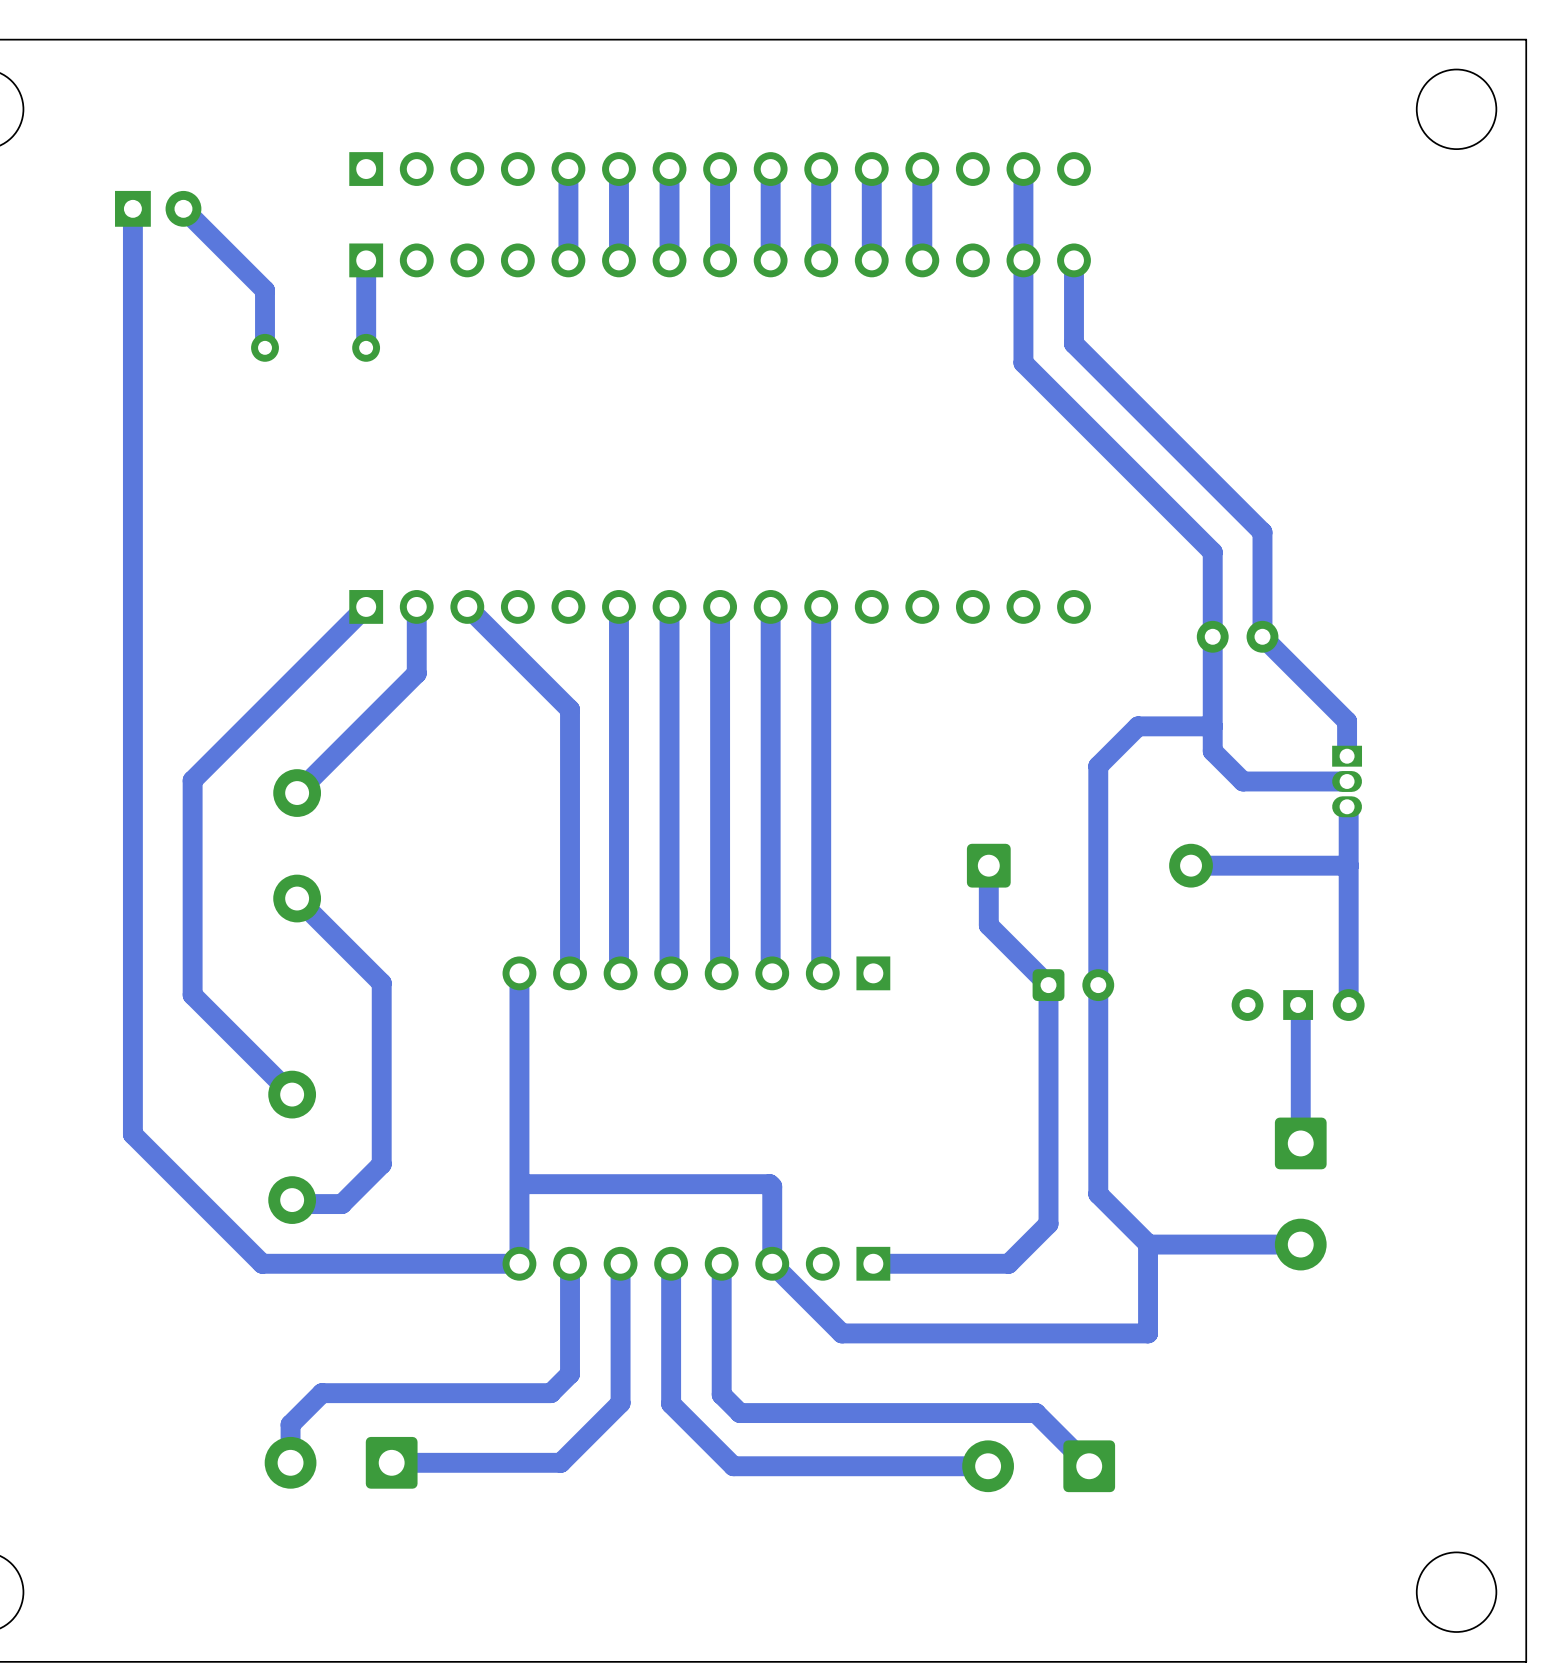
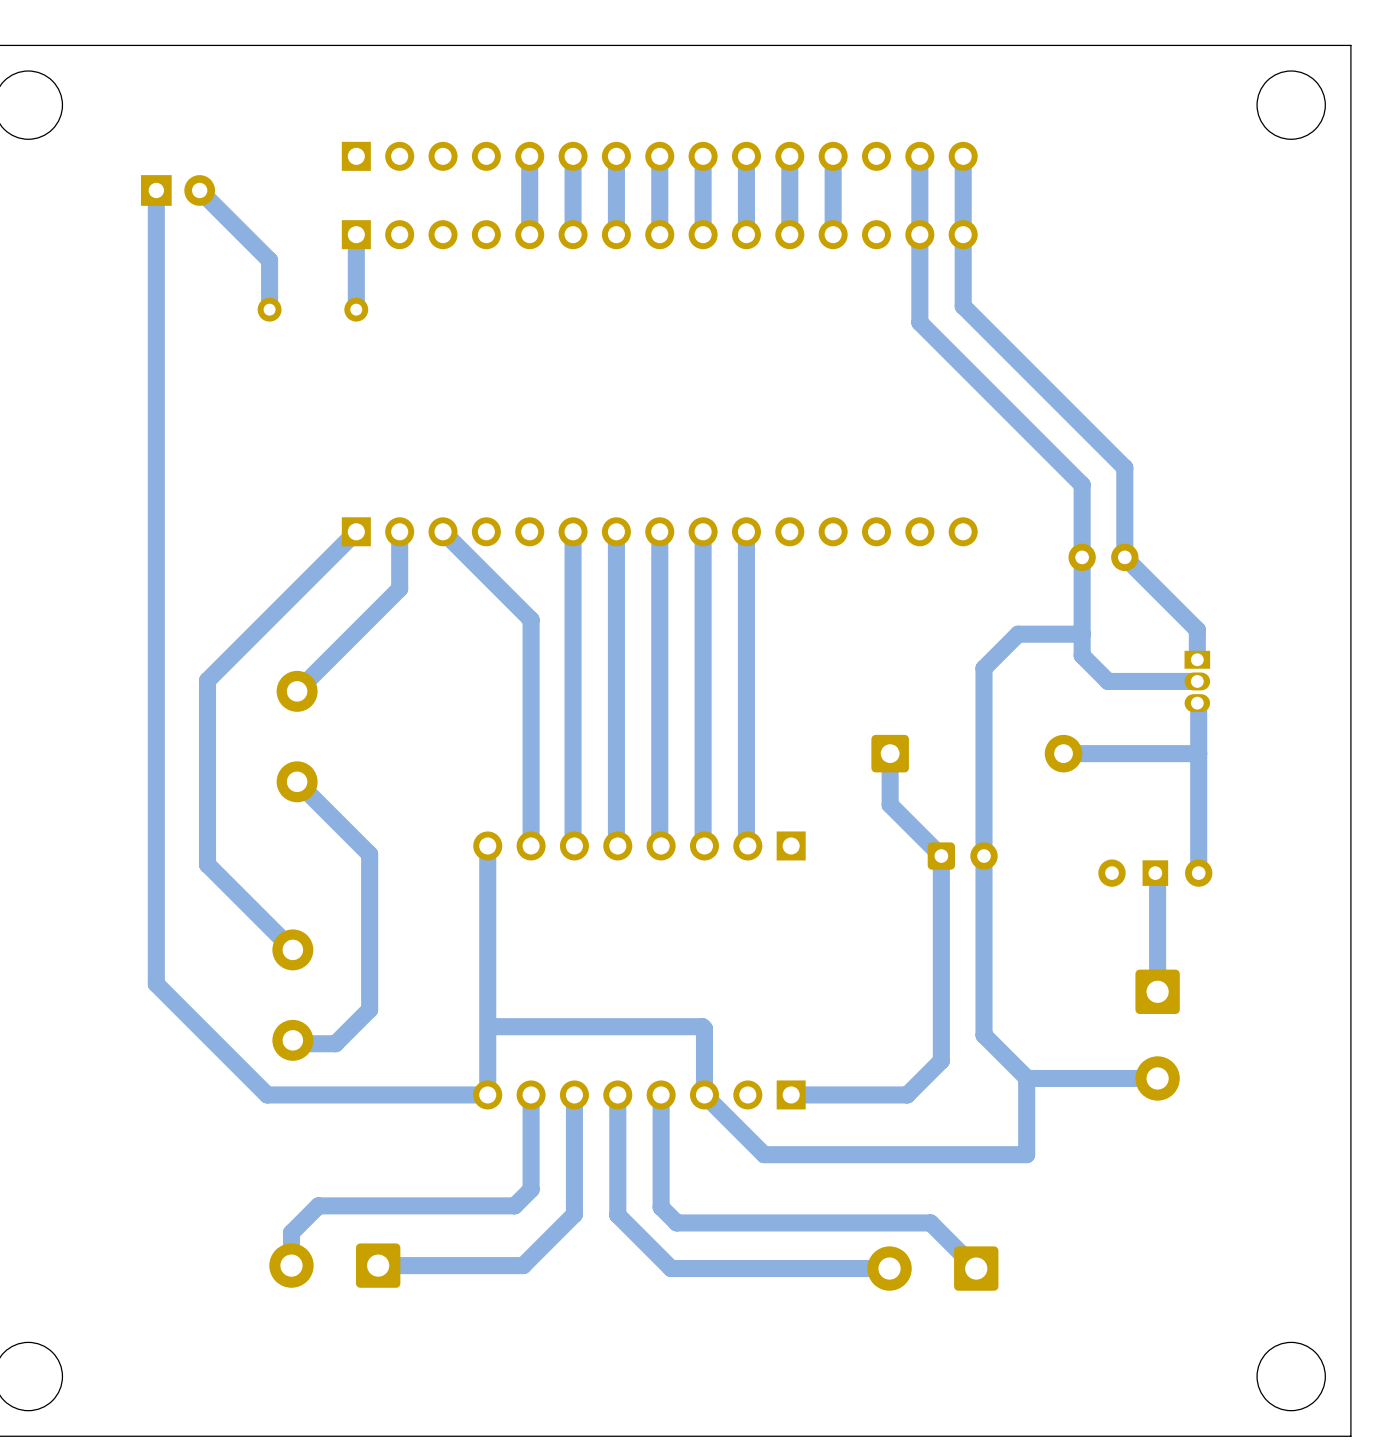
track: none -> (963, 156) (963, 234)

